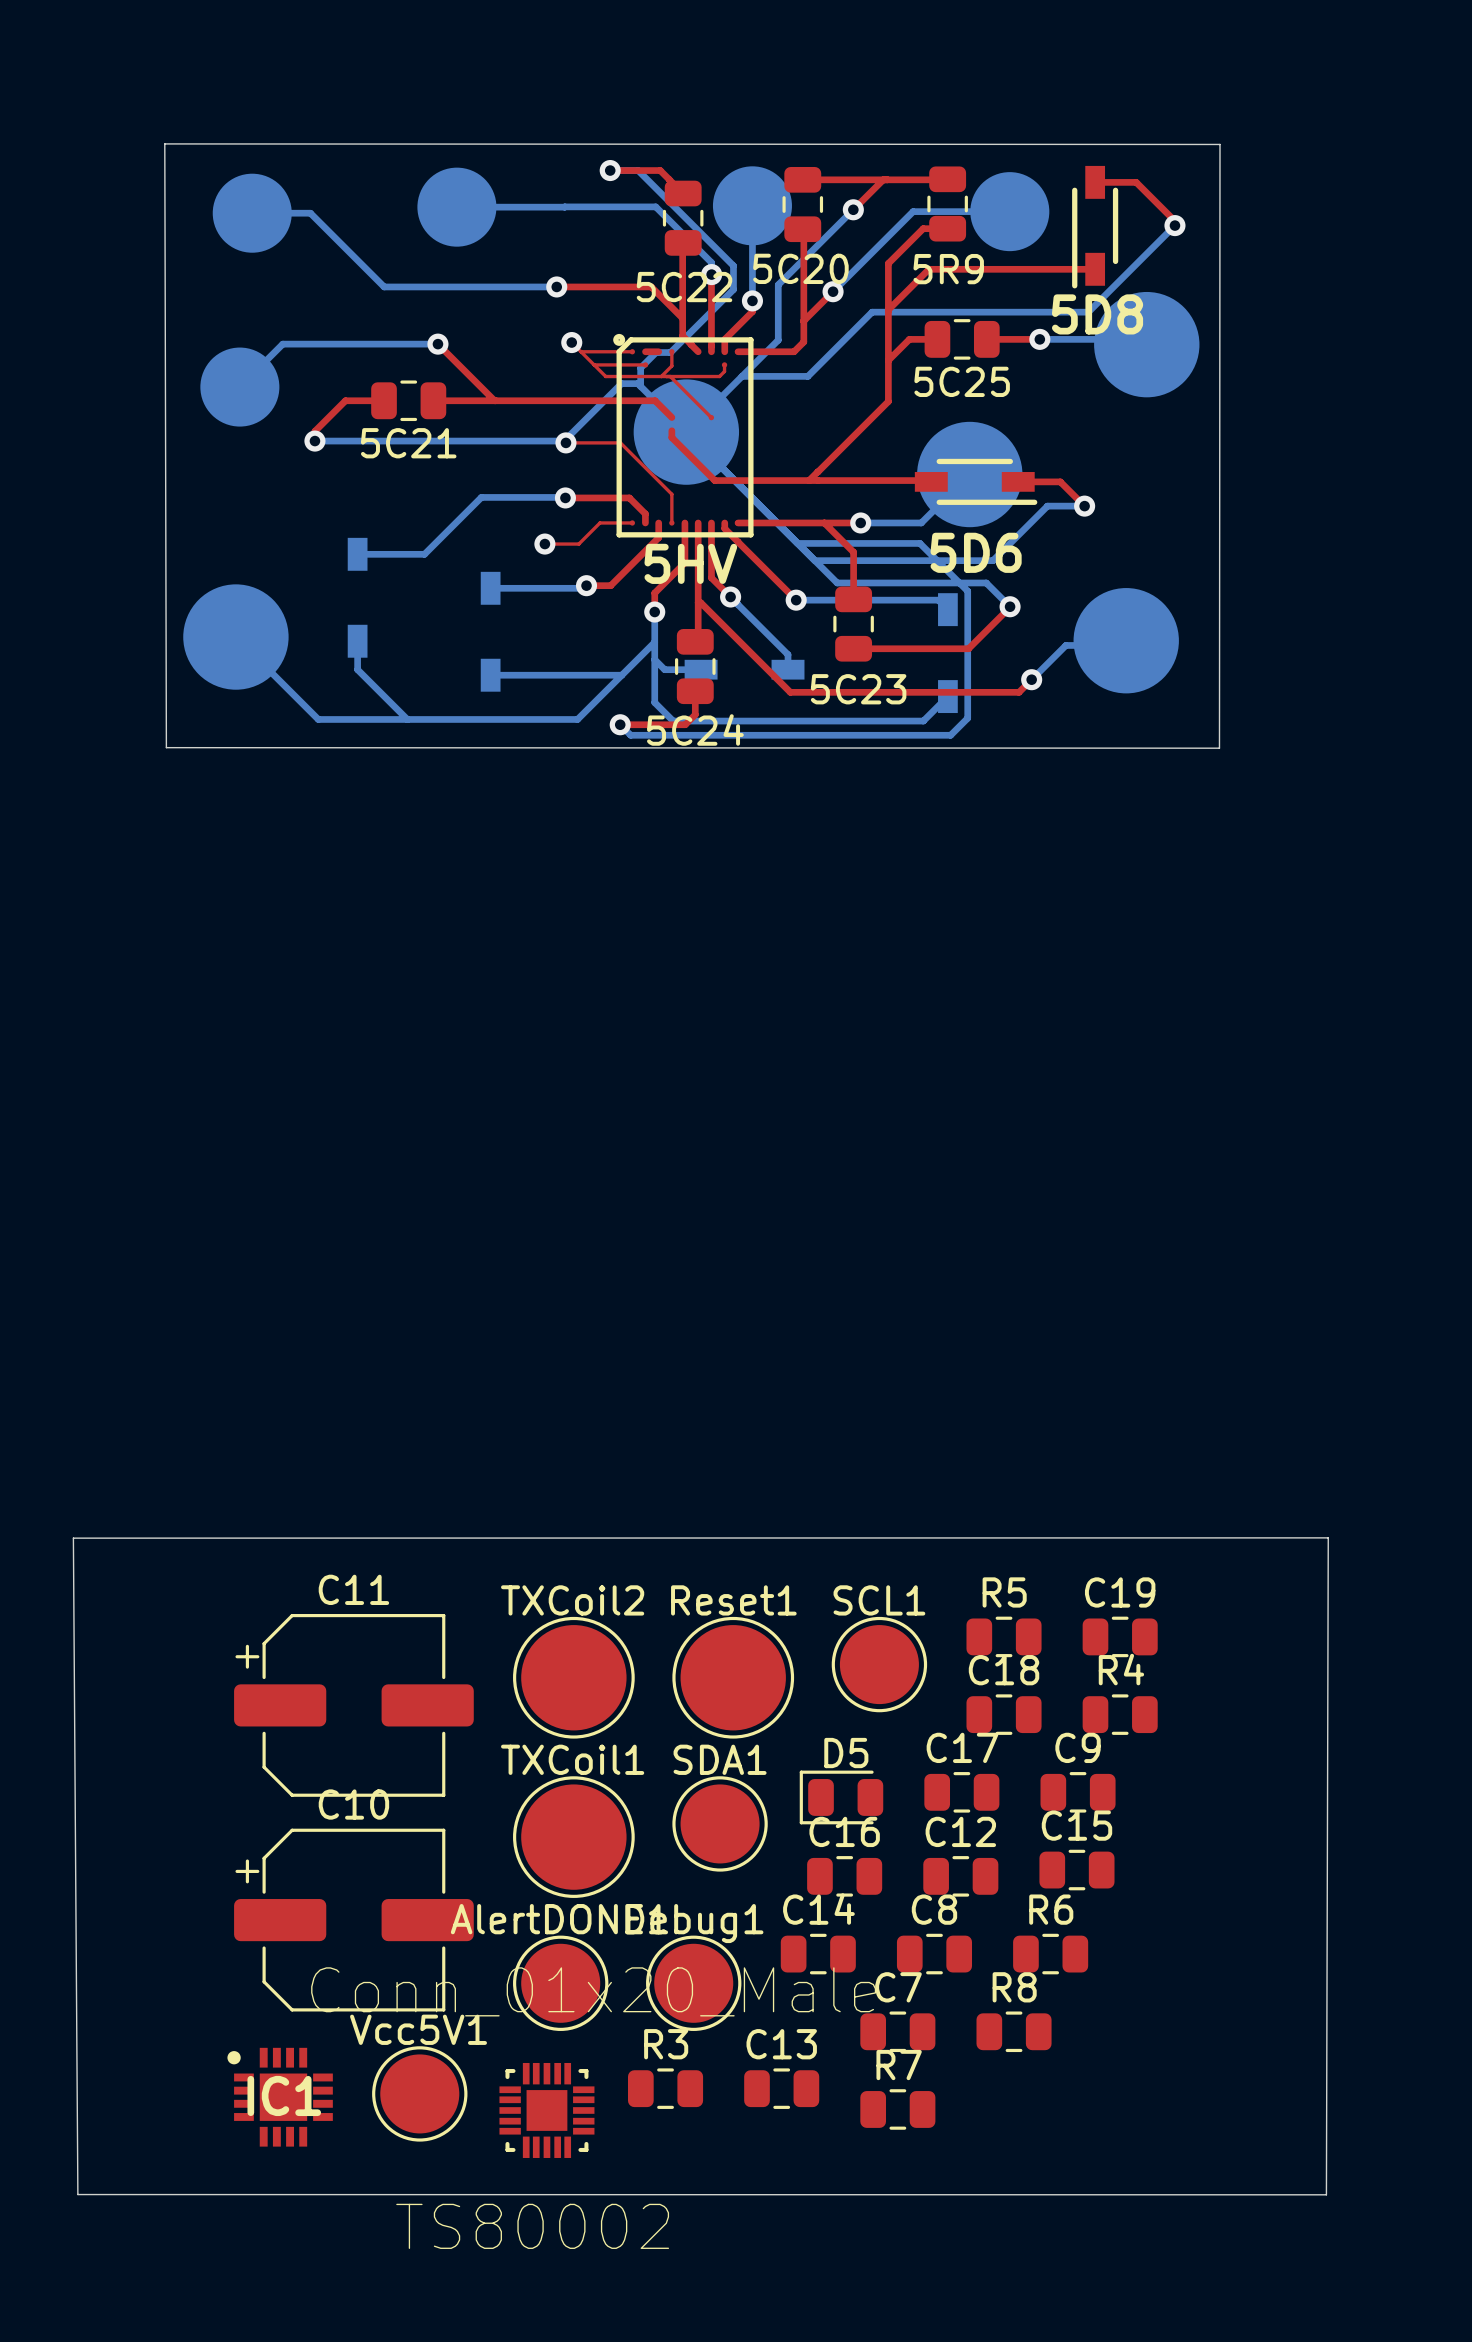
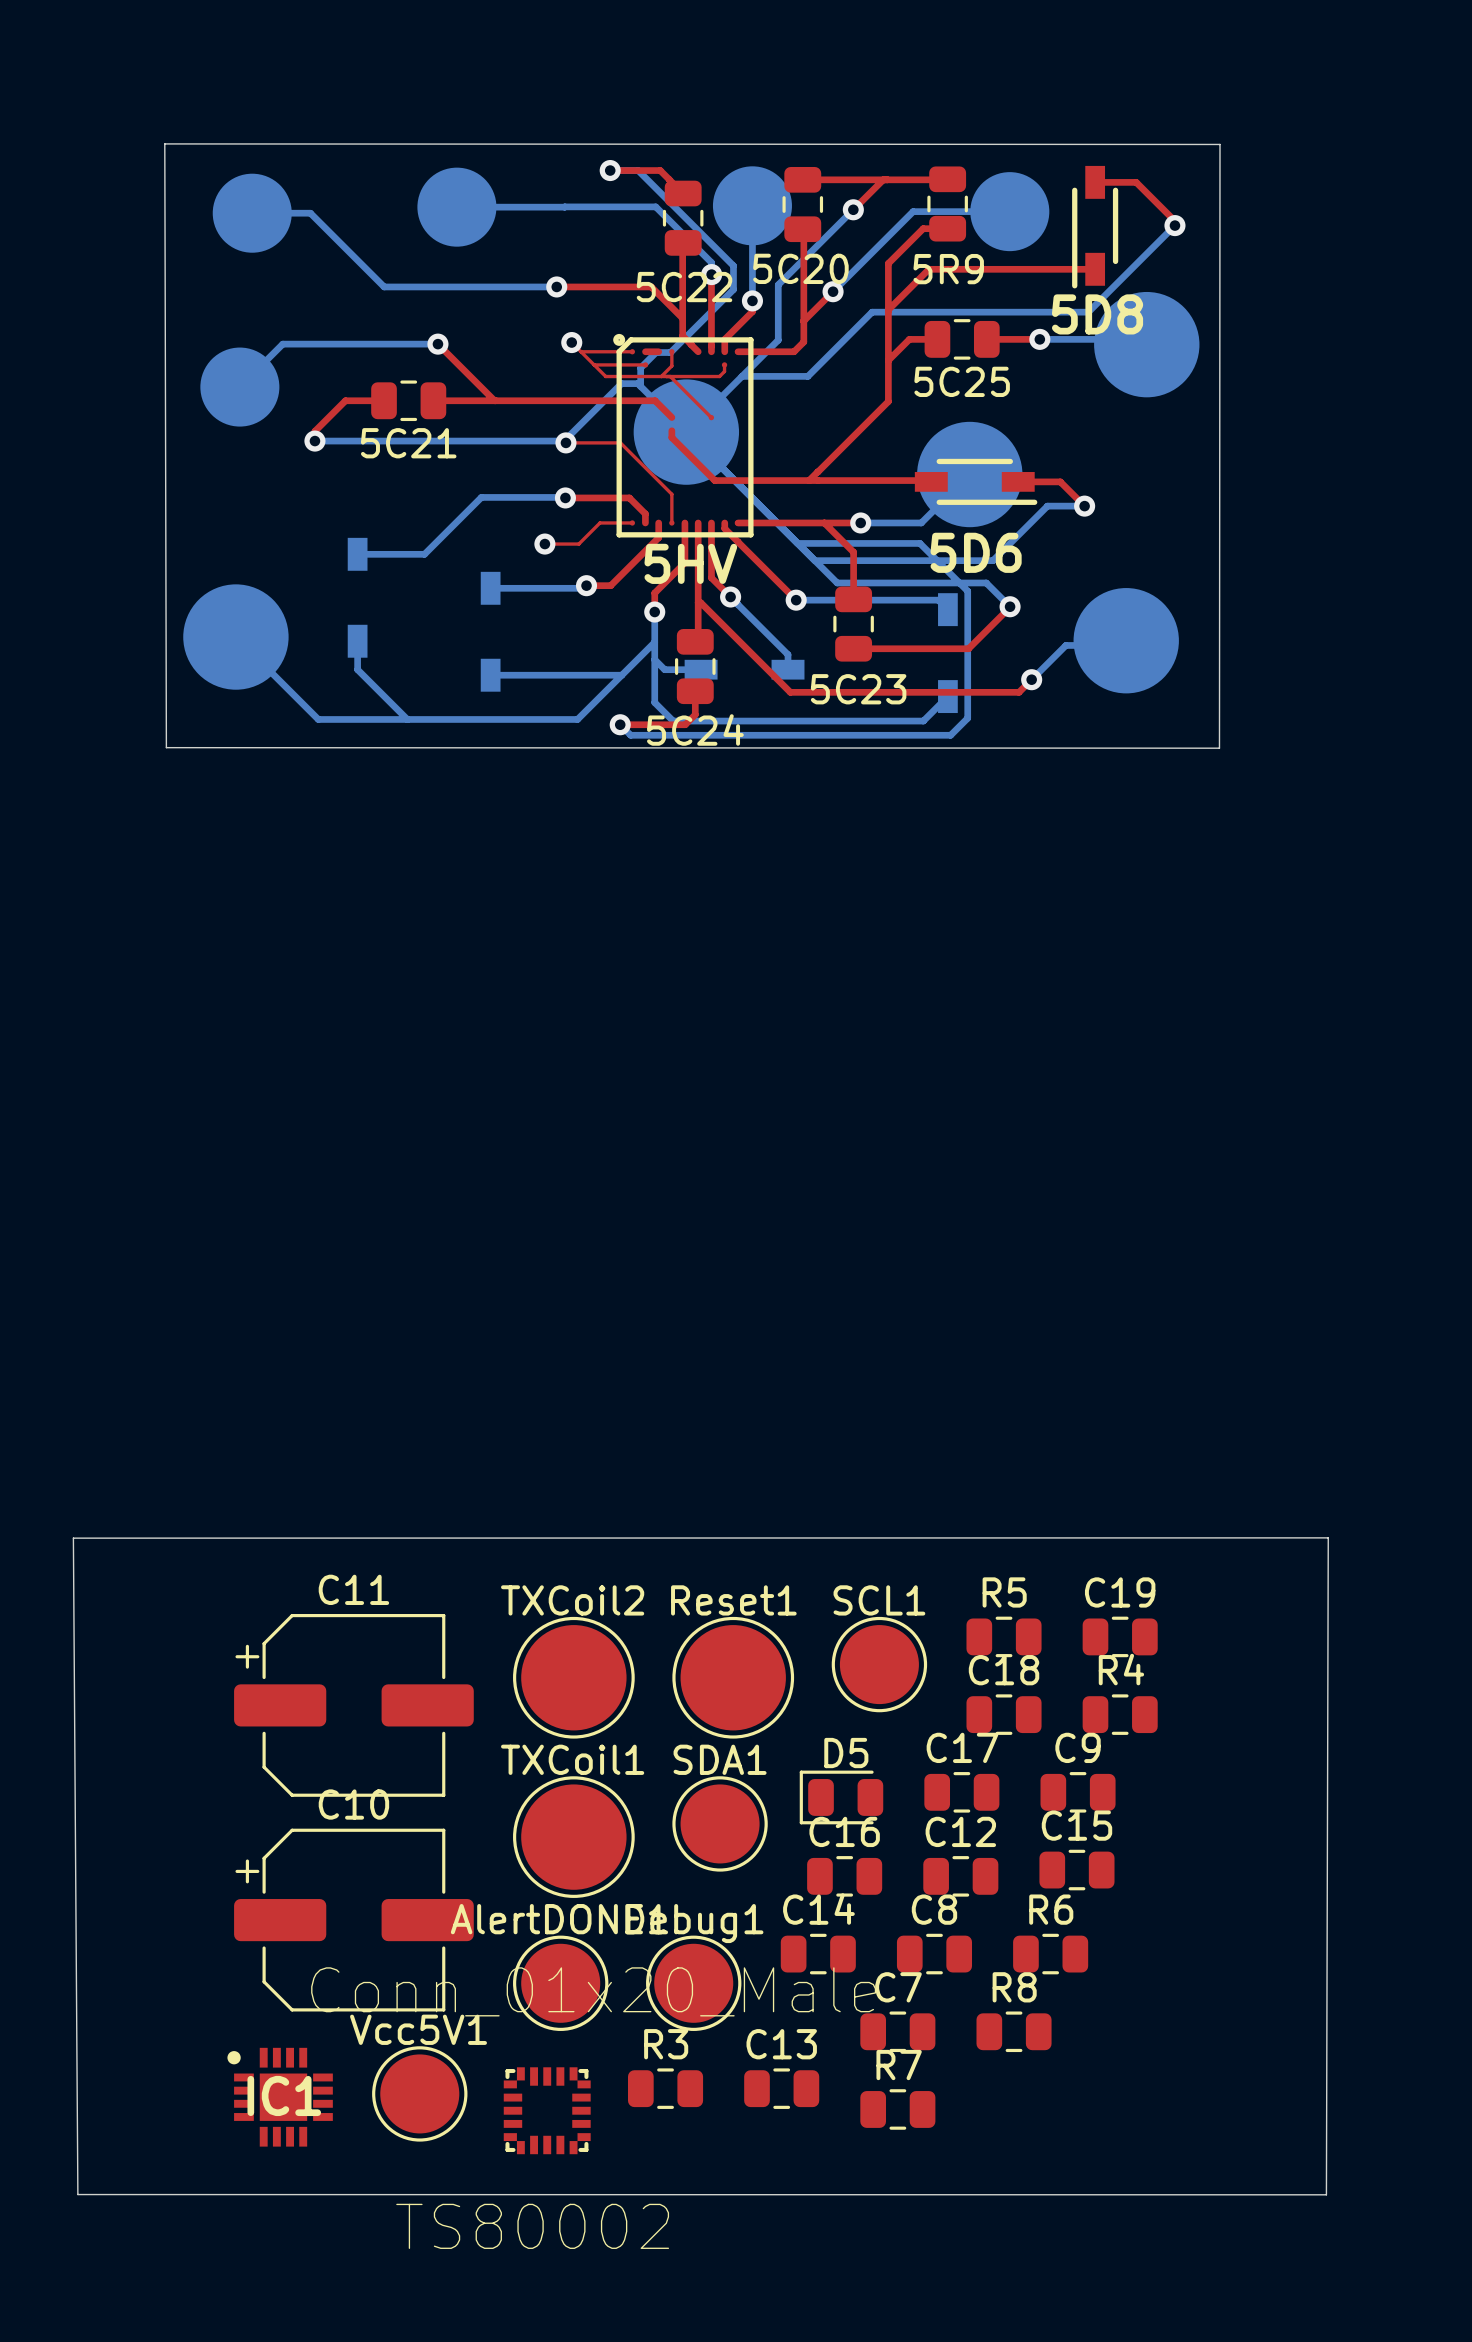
TS80002 footprint: [499, 2062, 595, 2158] -> [503, 2067, 591, 2155]

